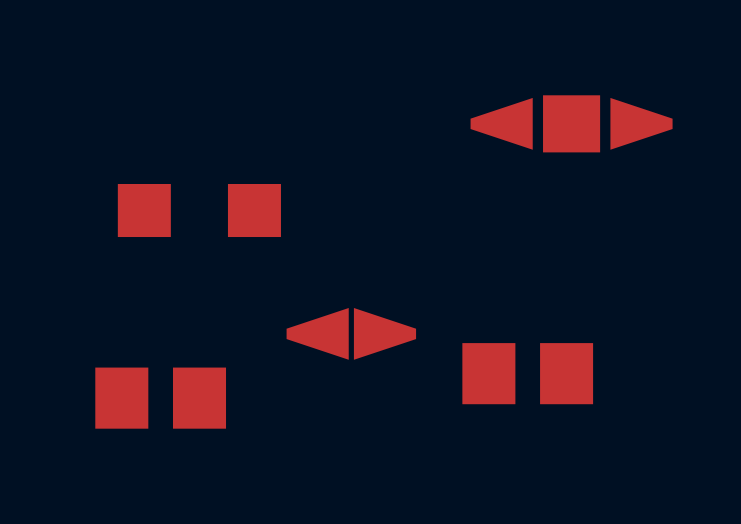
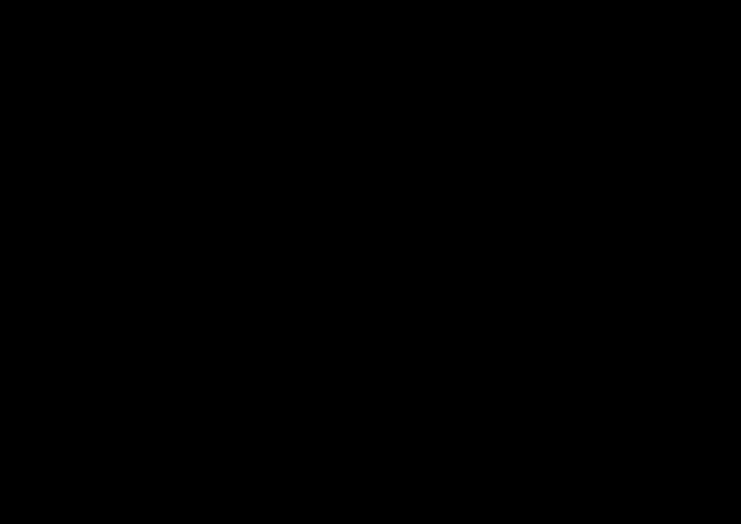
part: (571, 123) -> none
part: (199, 210) -> none
part: (351, 333) -> none
part: (527, 373) -> none
part: (160, 398) -> none

